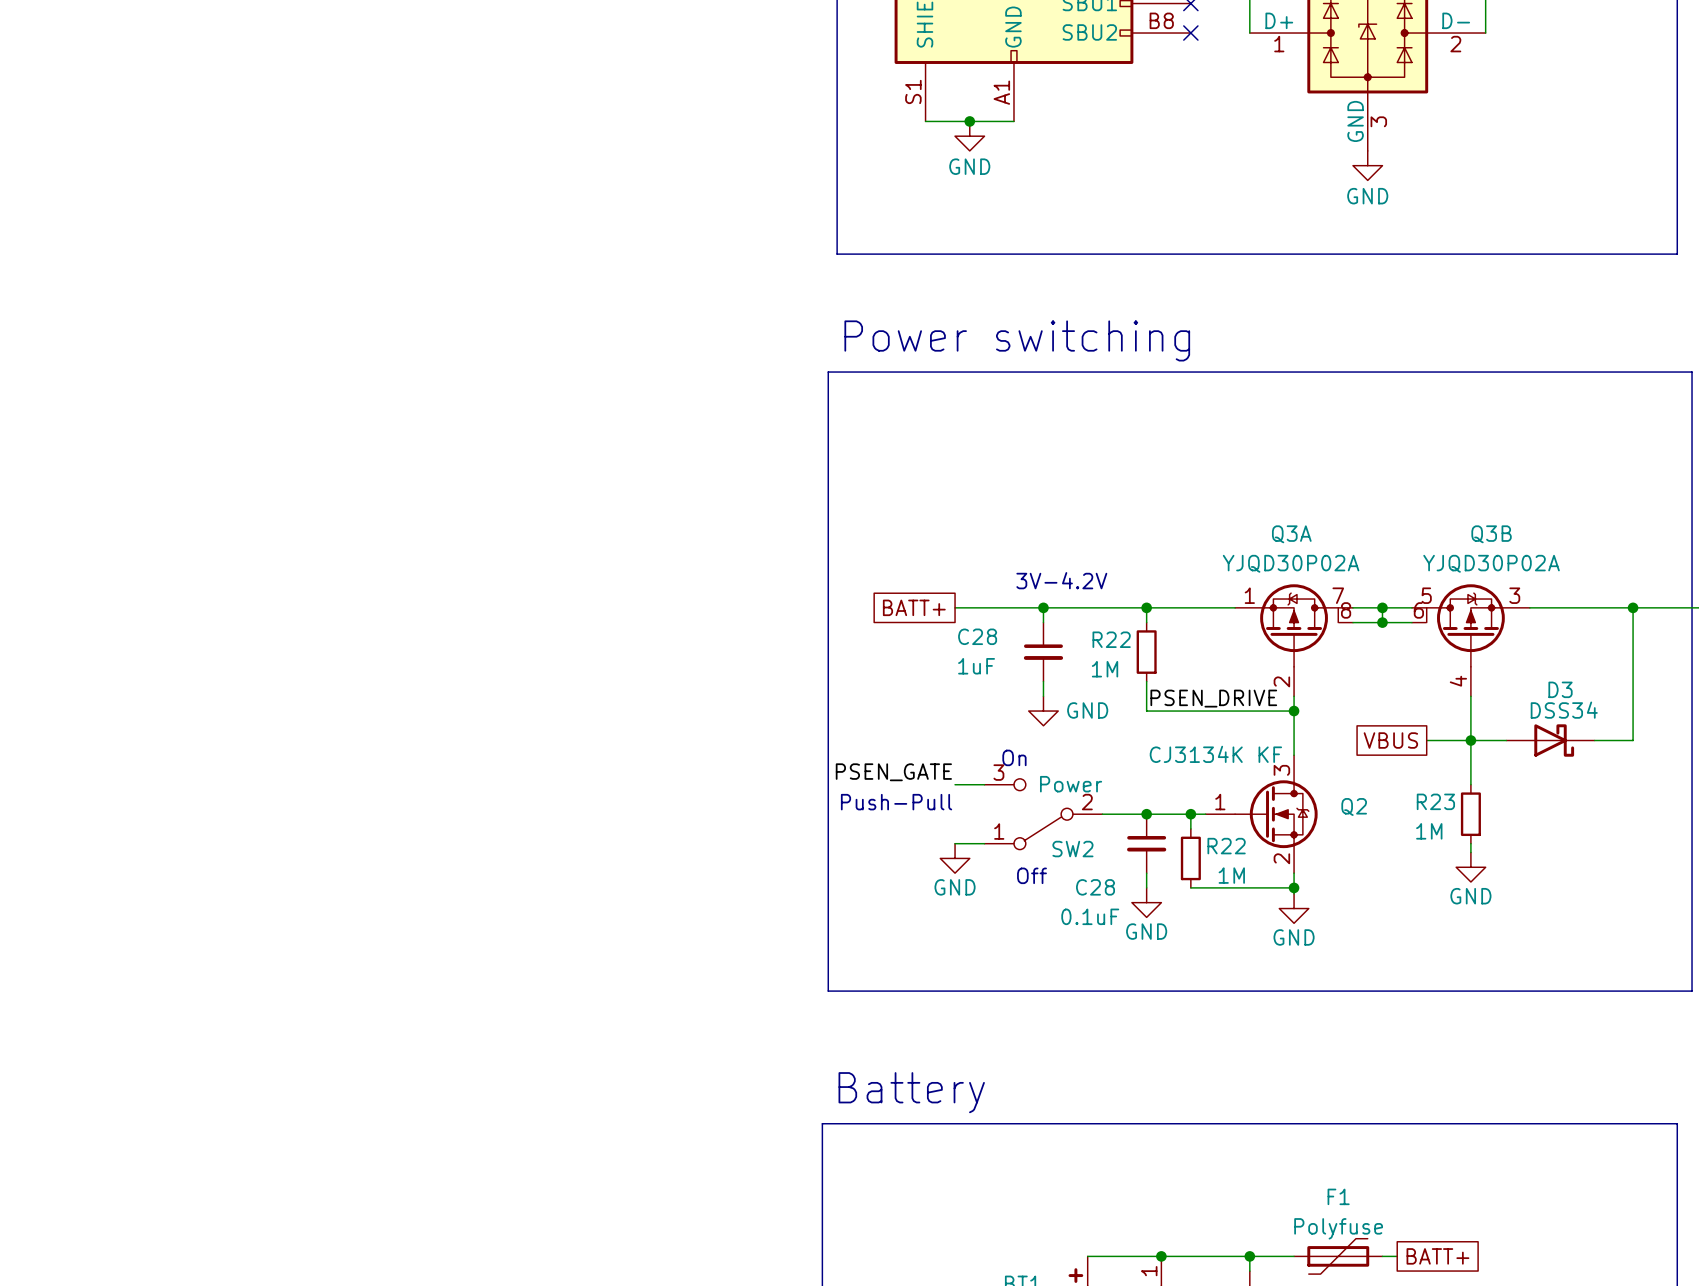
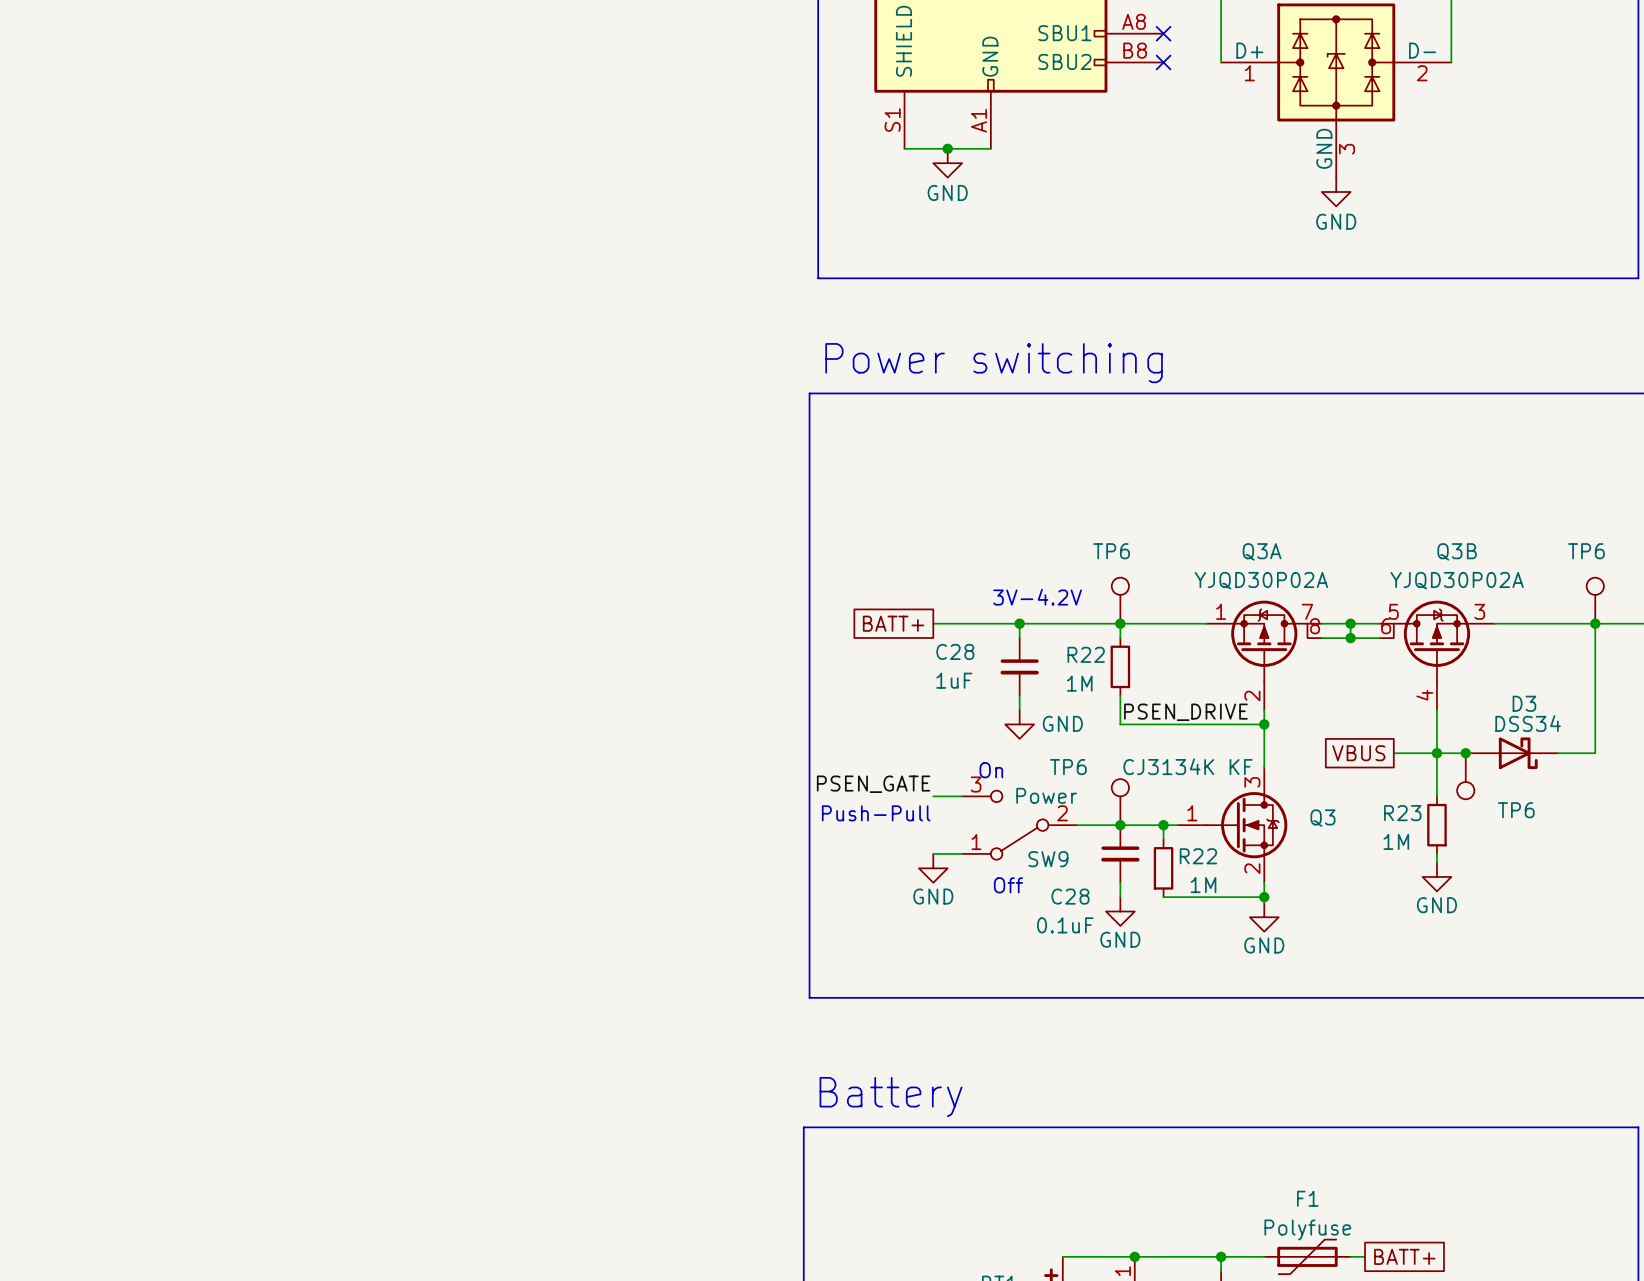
TP6: none -> (1120, 600)
TP6: none -> (1595, 600)
junction: none -> (1465, 753)
TP6: none -> (1465, 776)
TP6: none -> (1120, 802)
Q2 name: Q2 (1354, 806) -> Q3 (1322, 818)
SW2 name: SW2 (1072, 849) -> SW9 (1048, 859)

